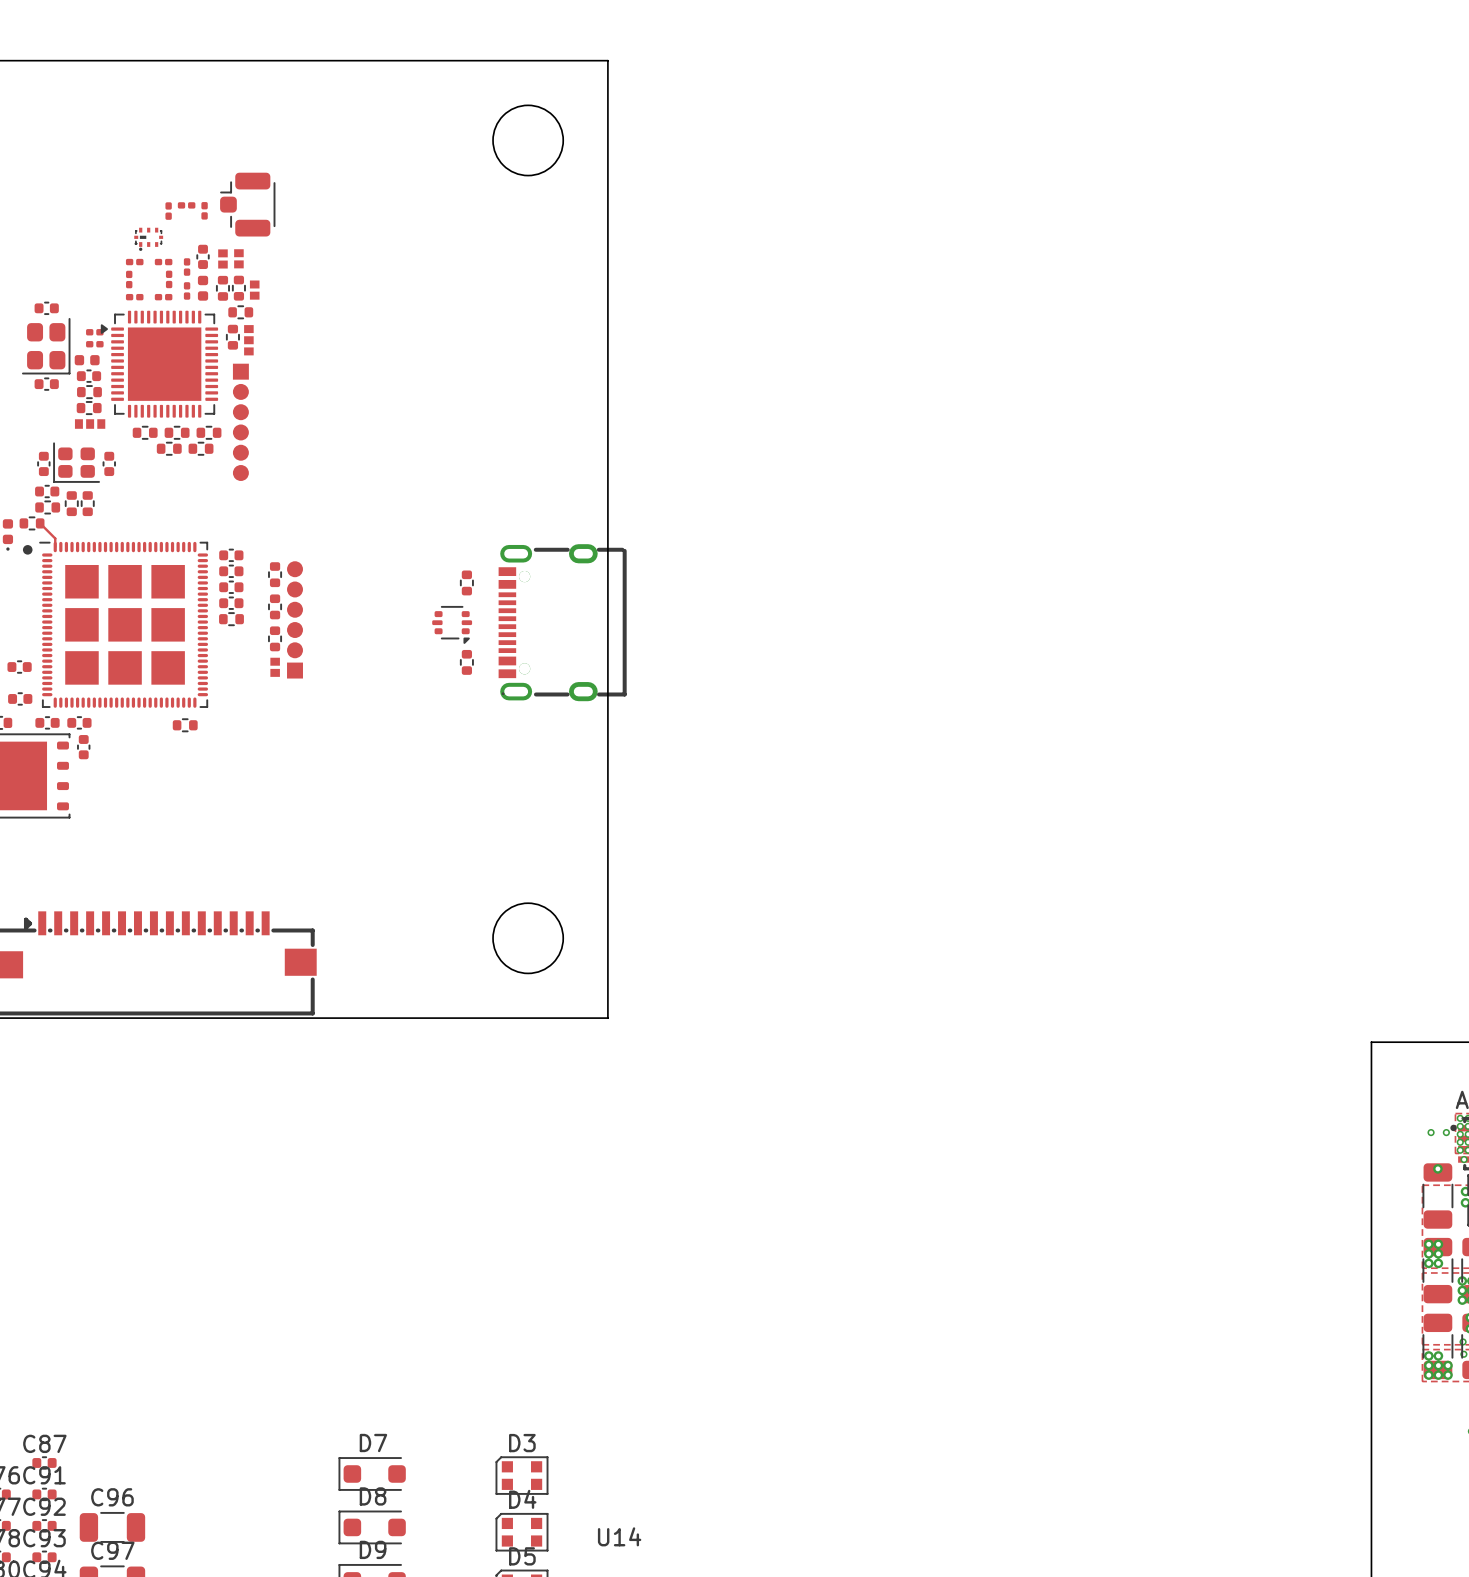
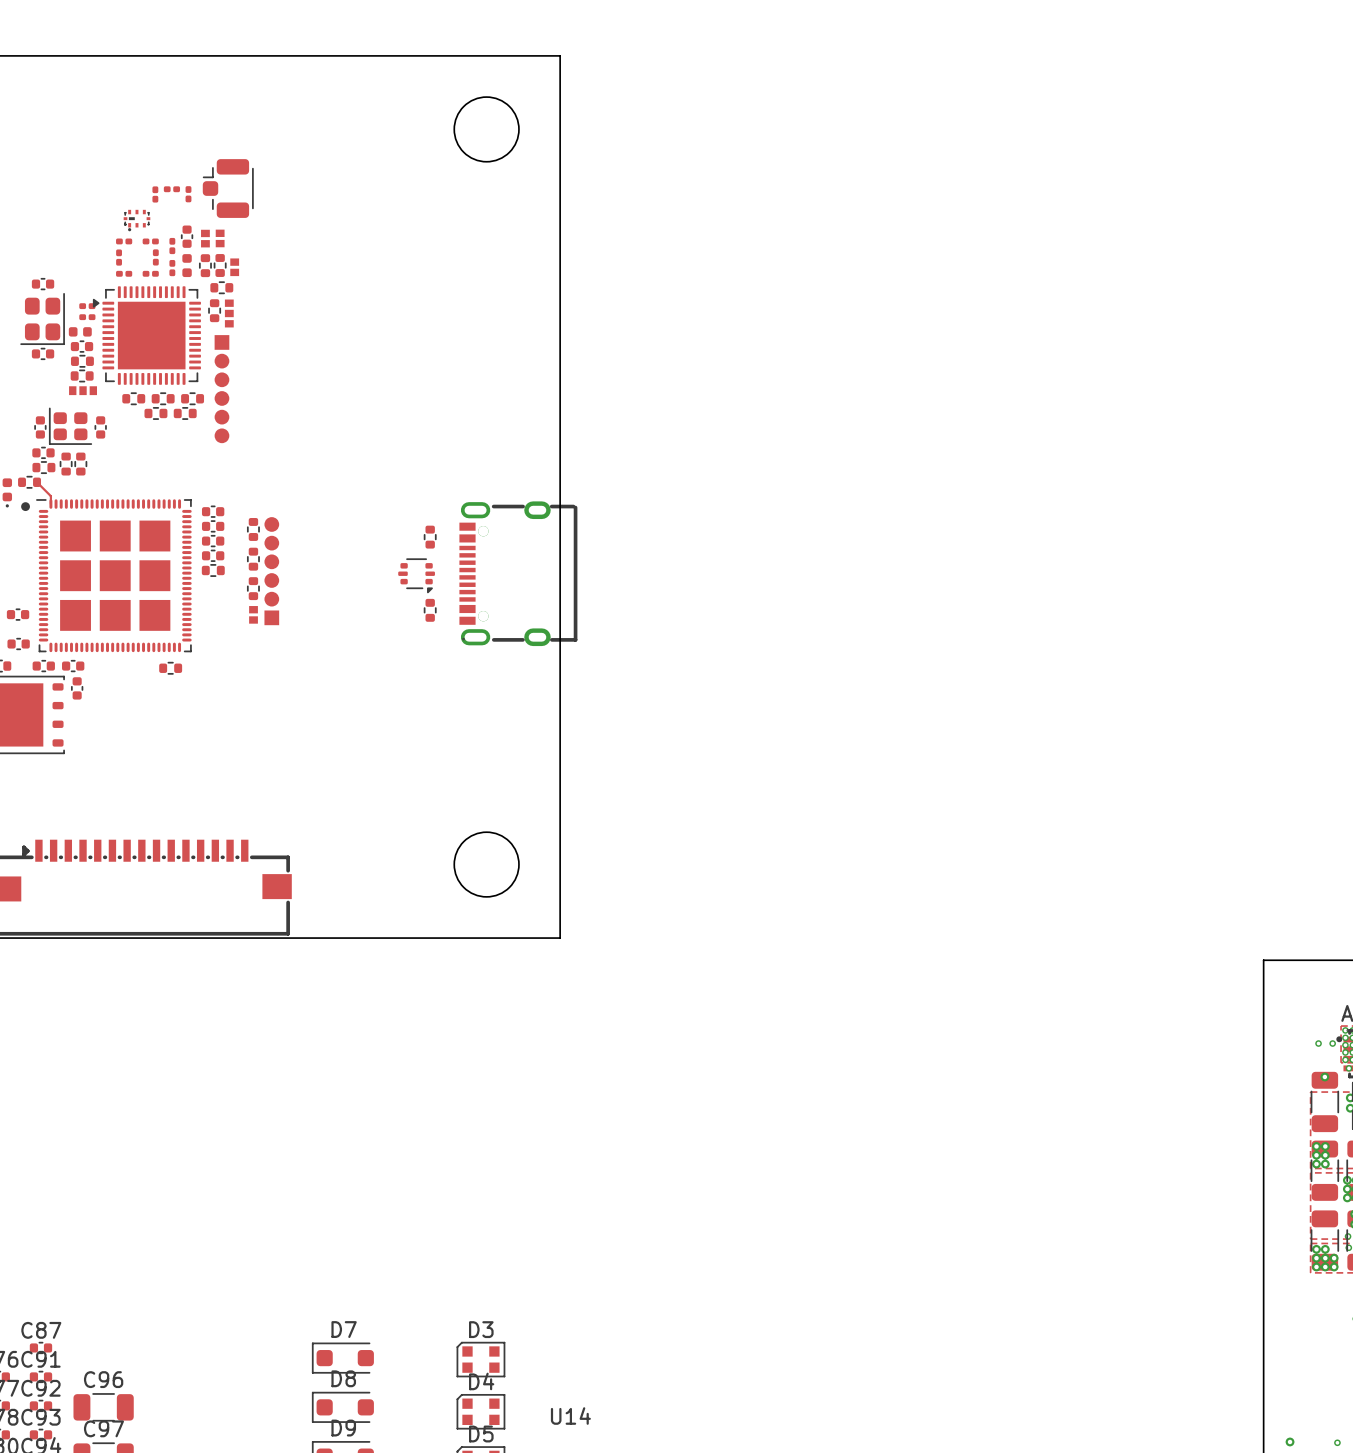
via: none -> (1290, 1441)
via: none -> (1337, 1442)

